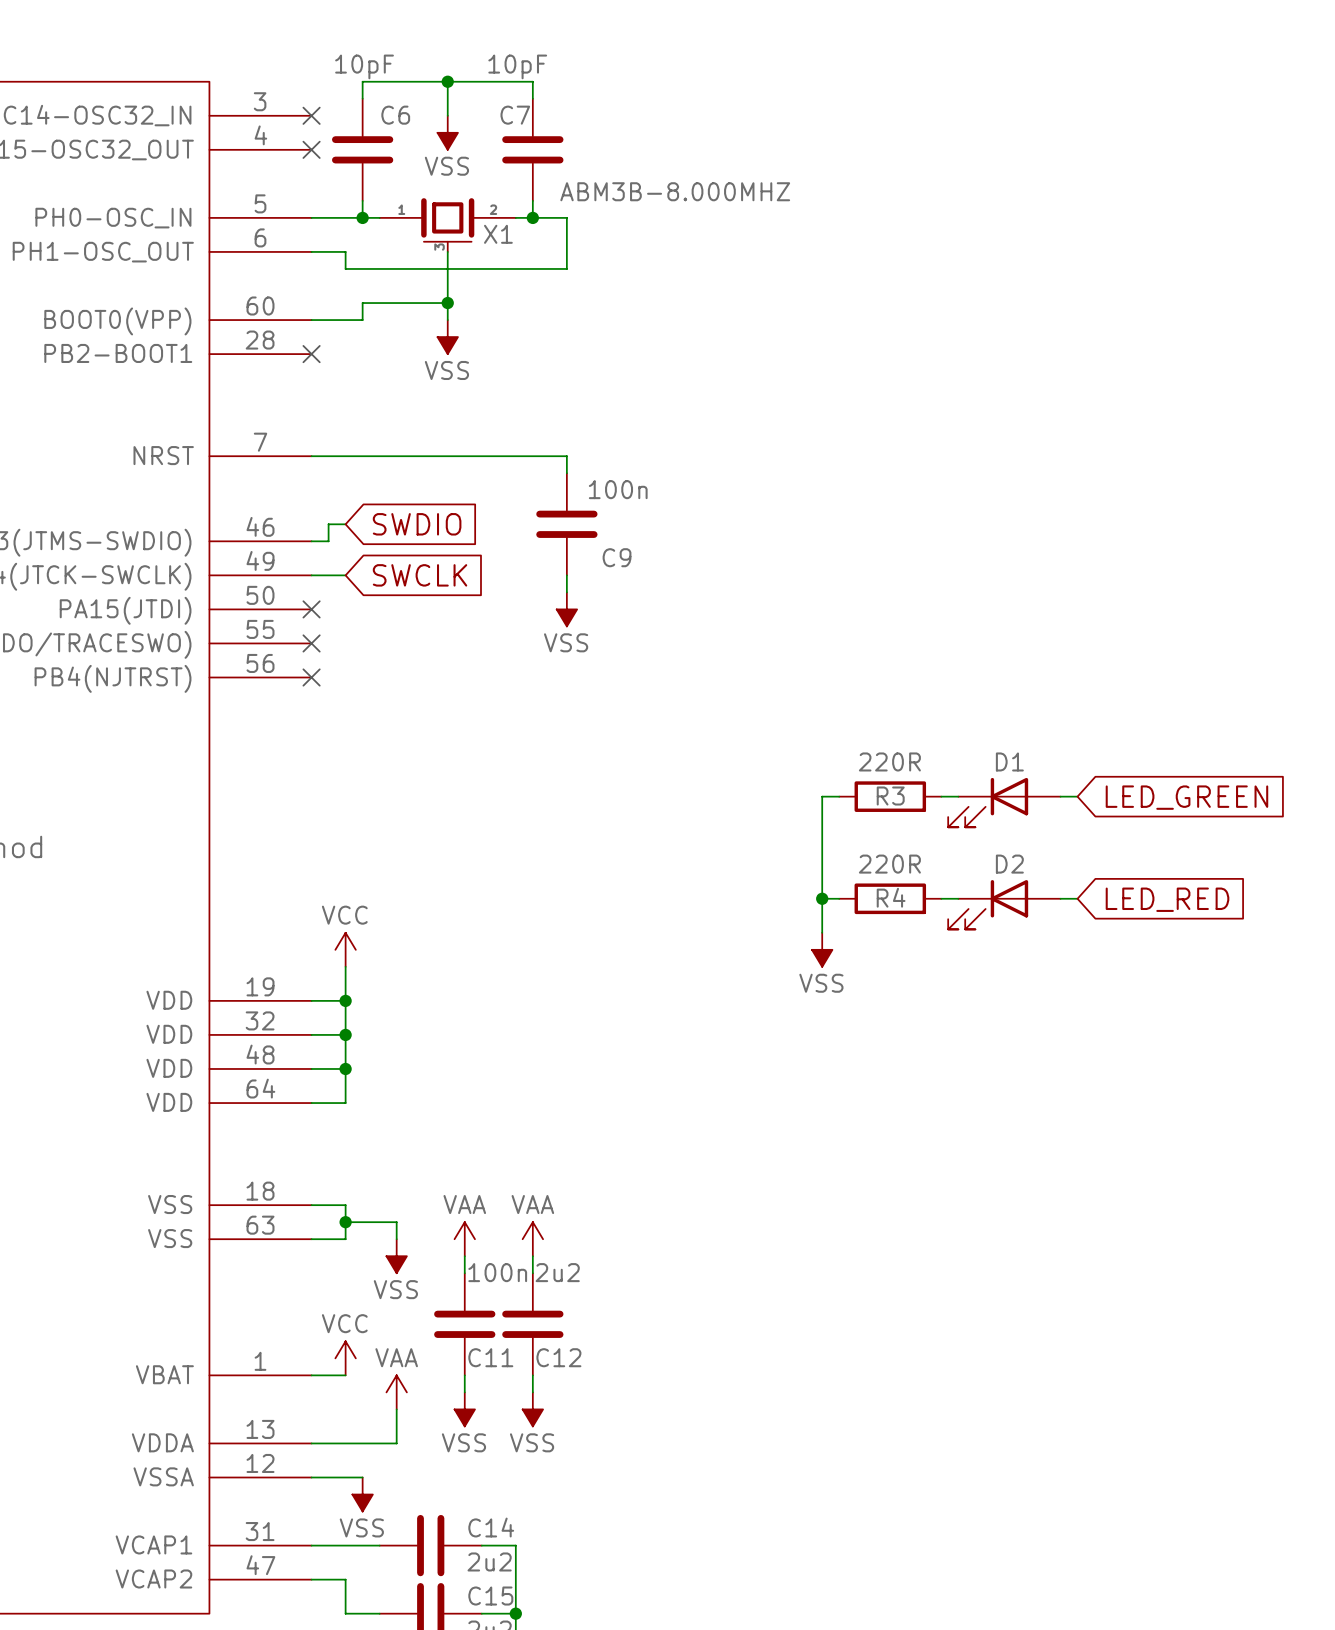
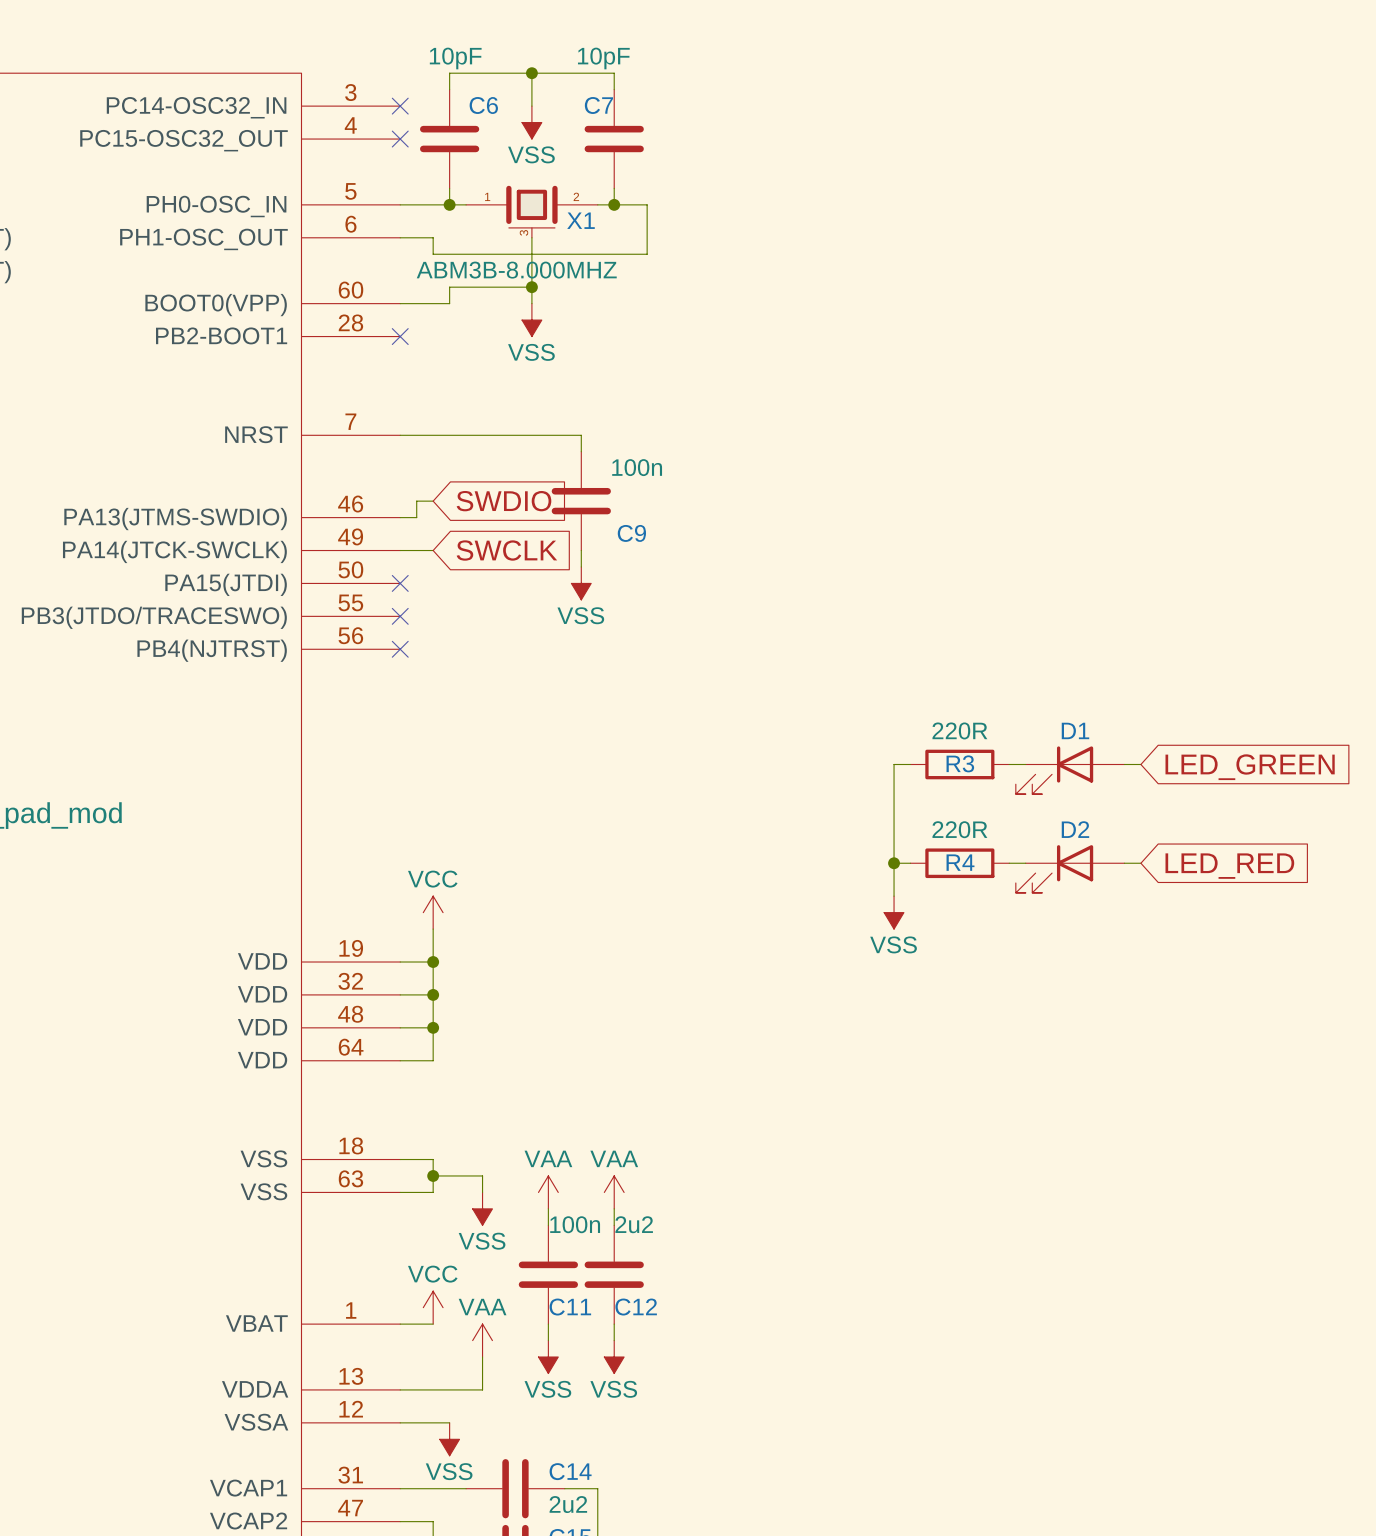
X1 value position: ABM3B-8.000MHZ (675, 191) -> ABM3B-8.000MHZ (516, 270)
wire: (498, 456) (566, 456) (566, 473) -> (581, 435) (581, 451)
C9 position: (566, 524) -> (581, 501)
wire: (566, 575) (566, 592) -> (581, 550) (581, 566)
power symbol position: VSS (566, 609) -> VSS (581, 583)

